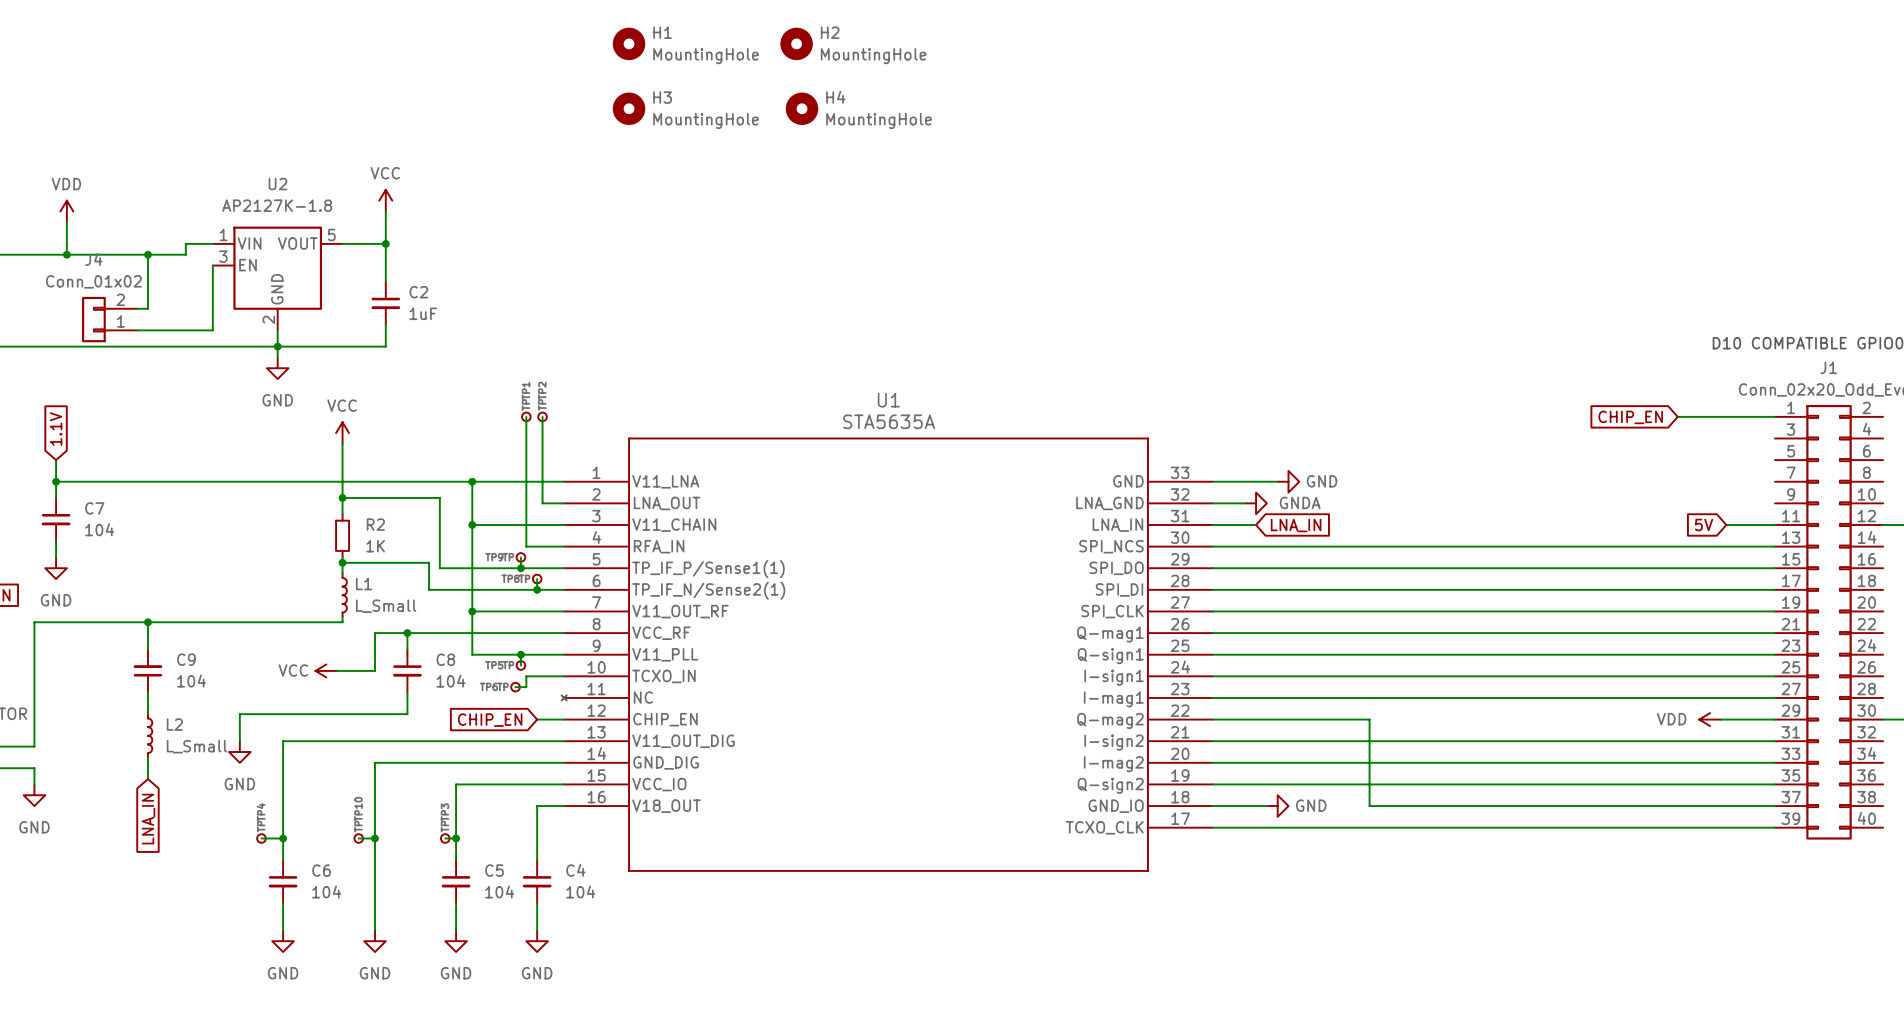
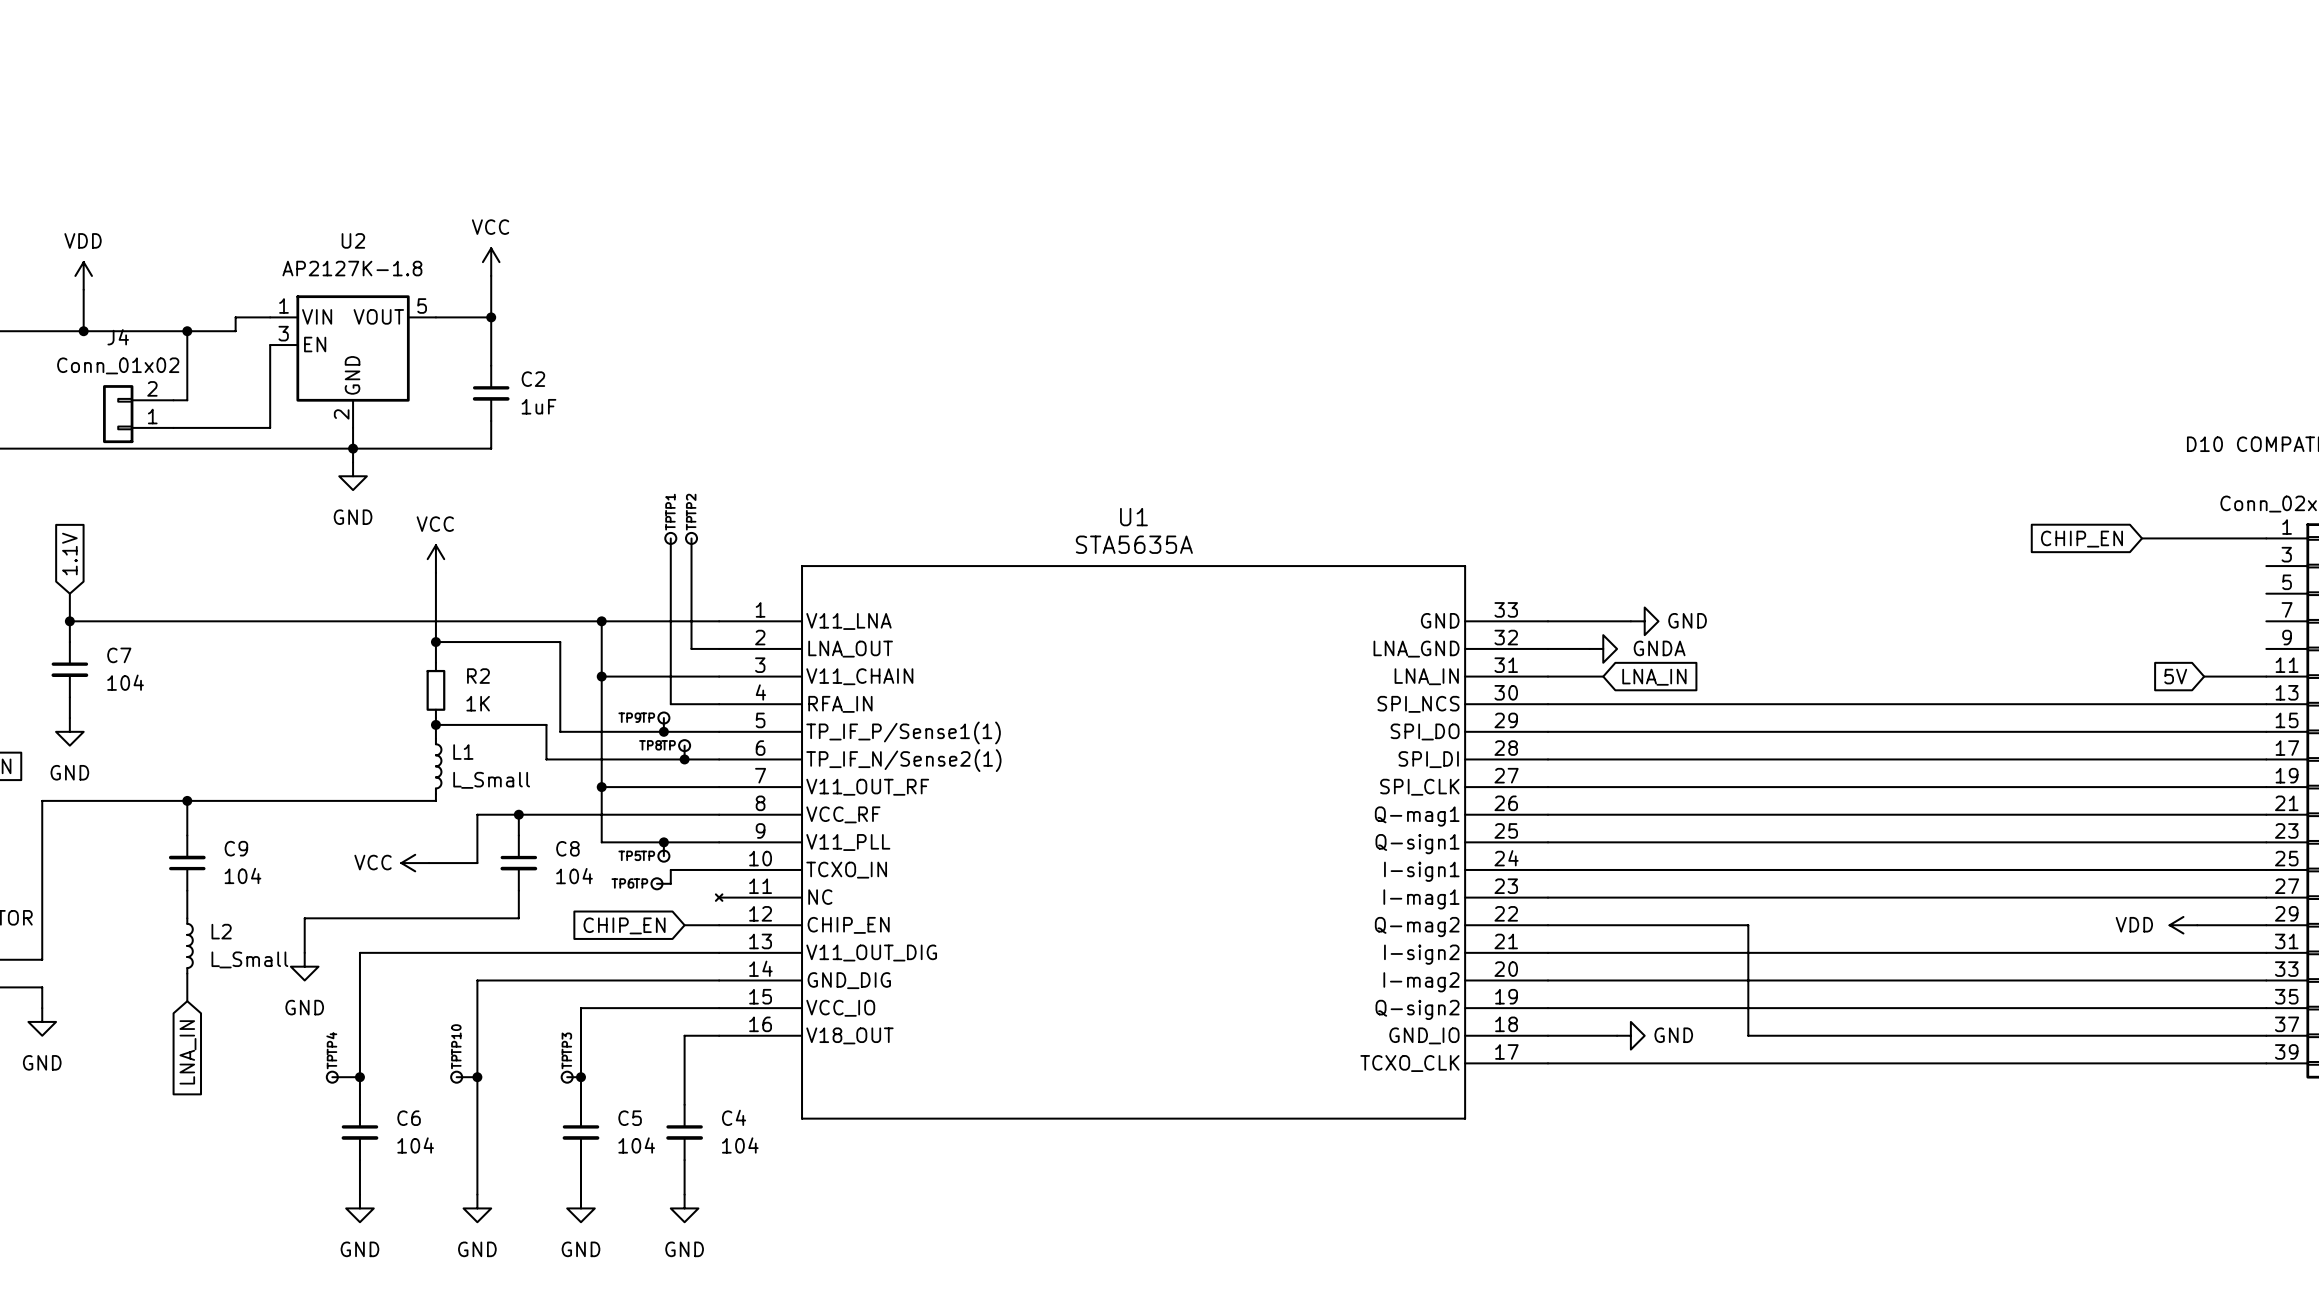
H1: MountingHole (629, 43) -> none
H2: MountingHole (796, 43) -> none
H3: MountingHole (629, 108) -> none
H4: MountingHole (802, 108) -> none

